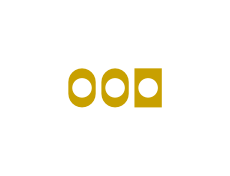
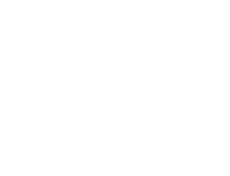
part: (115, 87) -> none

